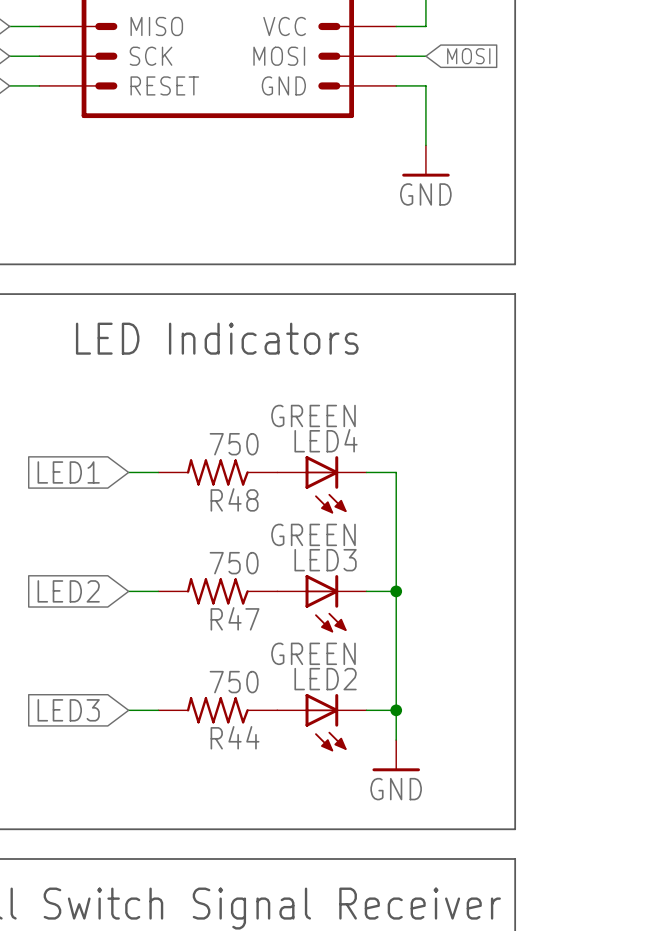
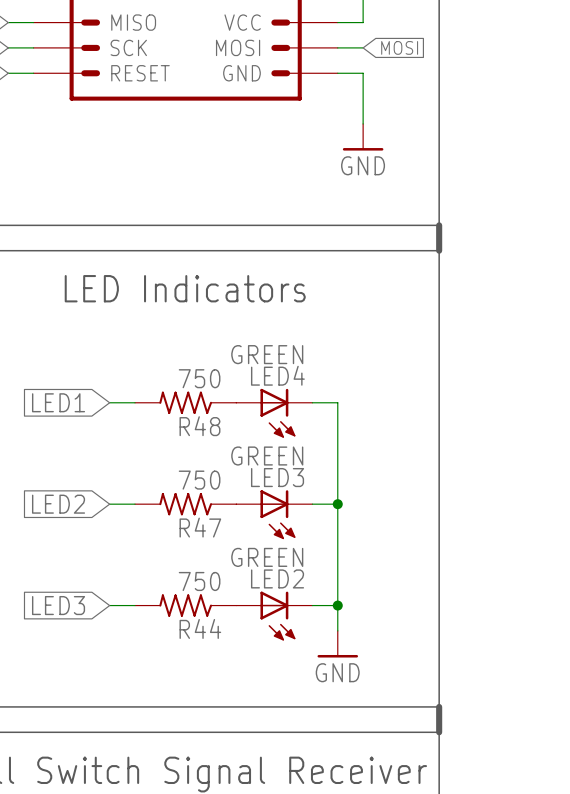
line: none -> (439, 225) (439, 250)
line: none -> (439, 706) (439, 732)

